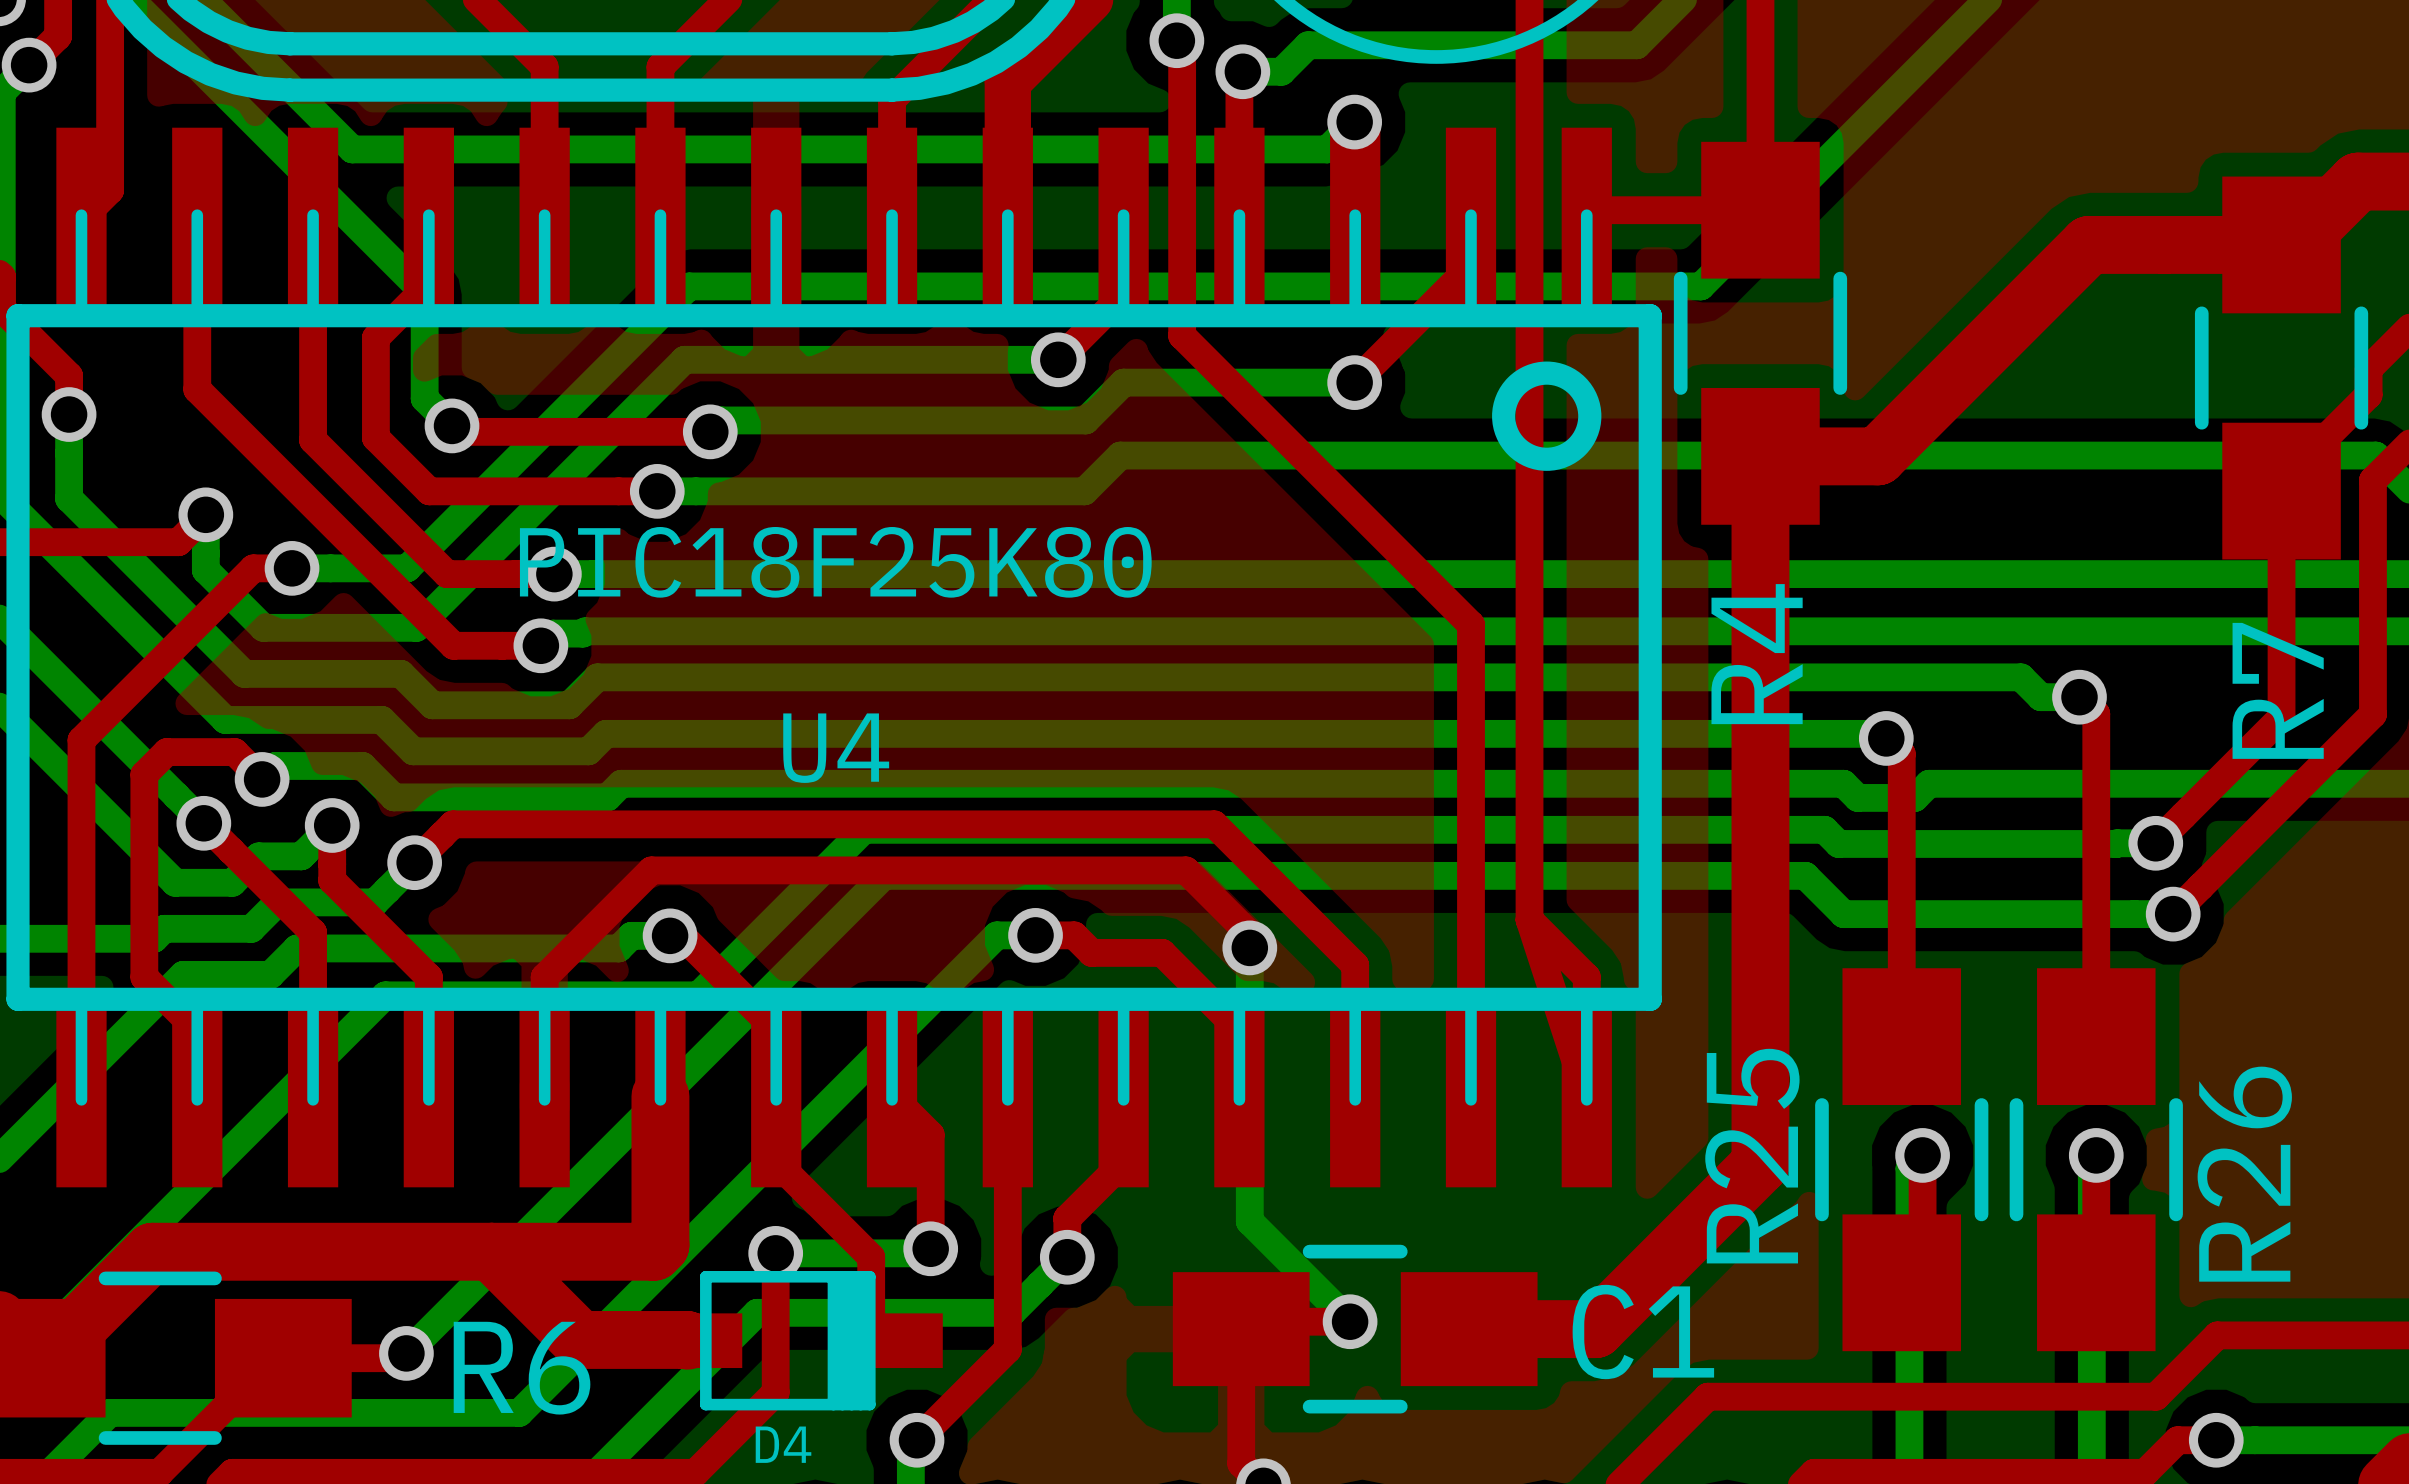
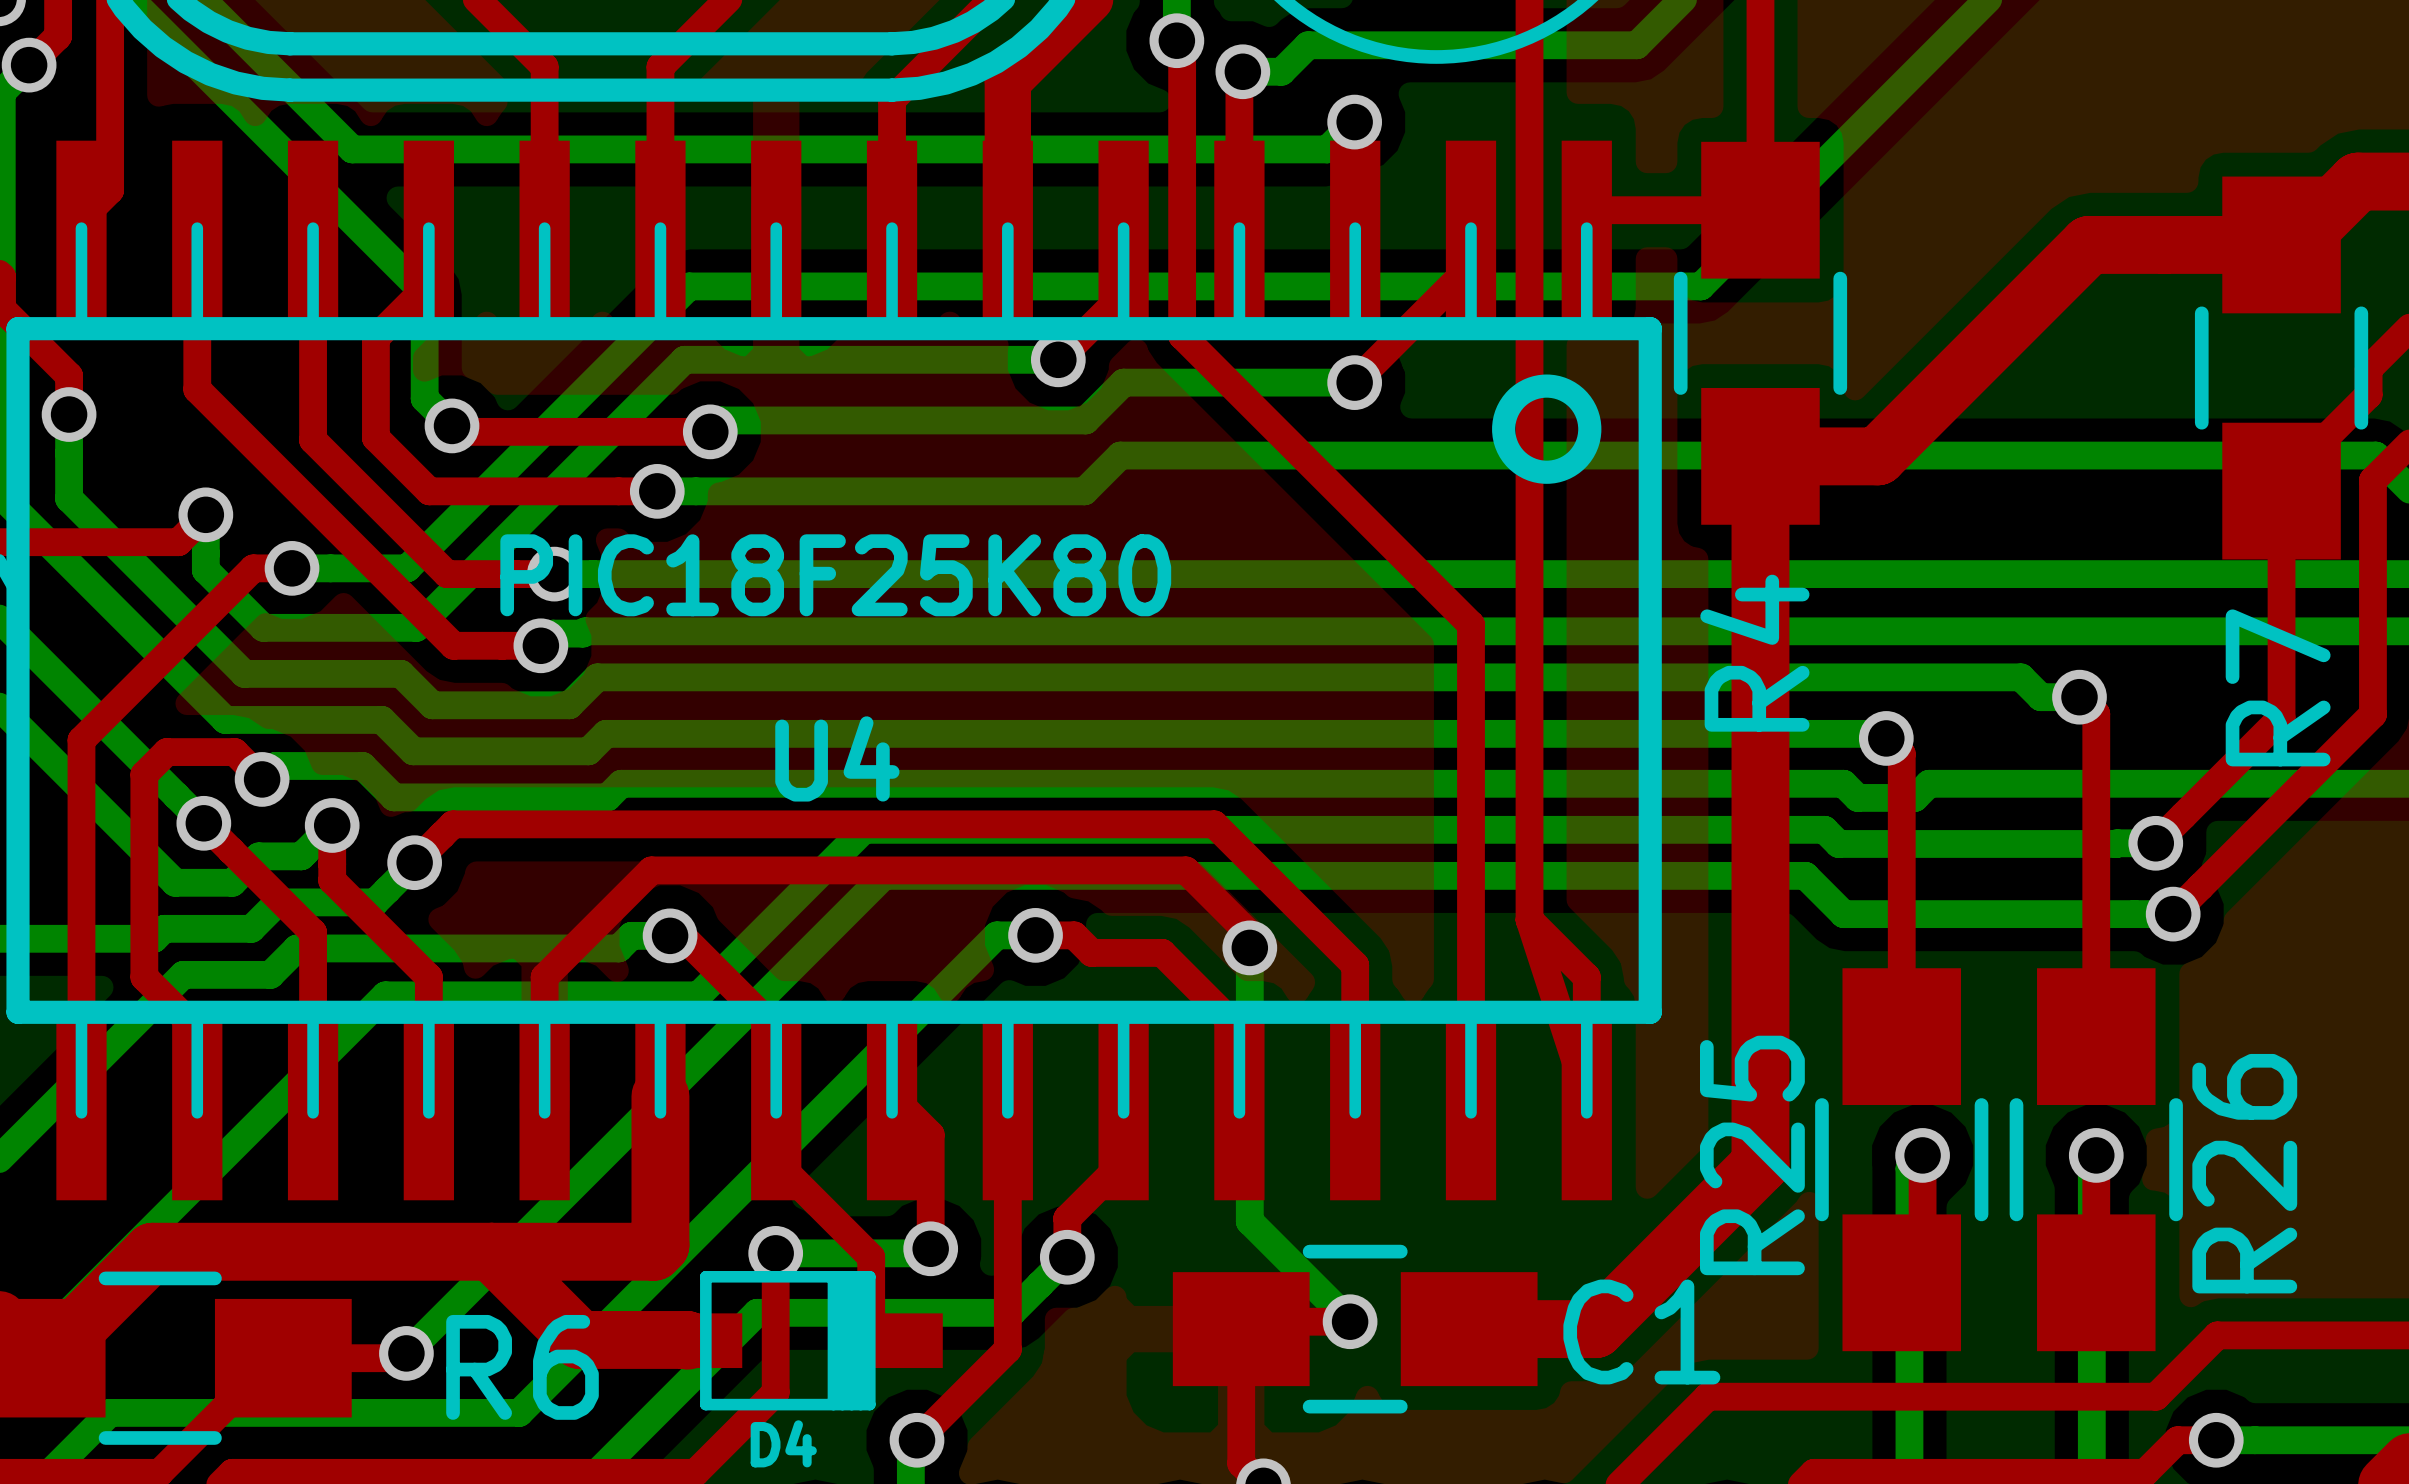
U4 position: (834, 657) -> (834, 670)

